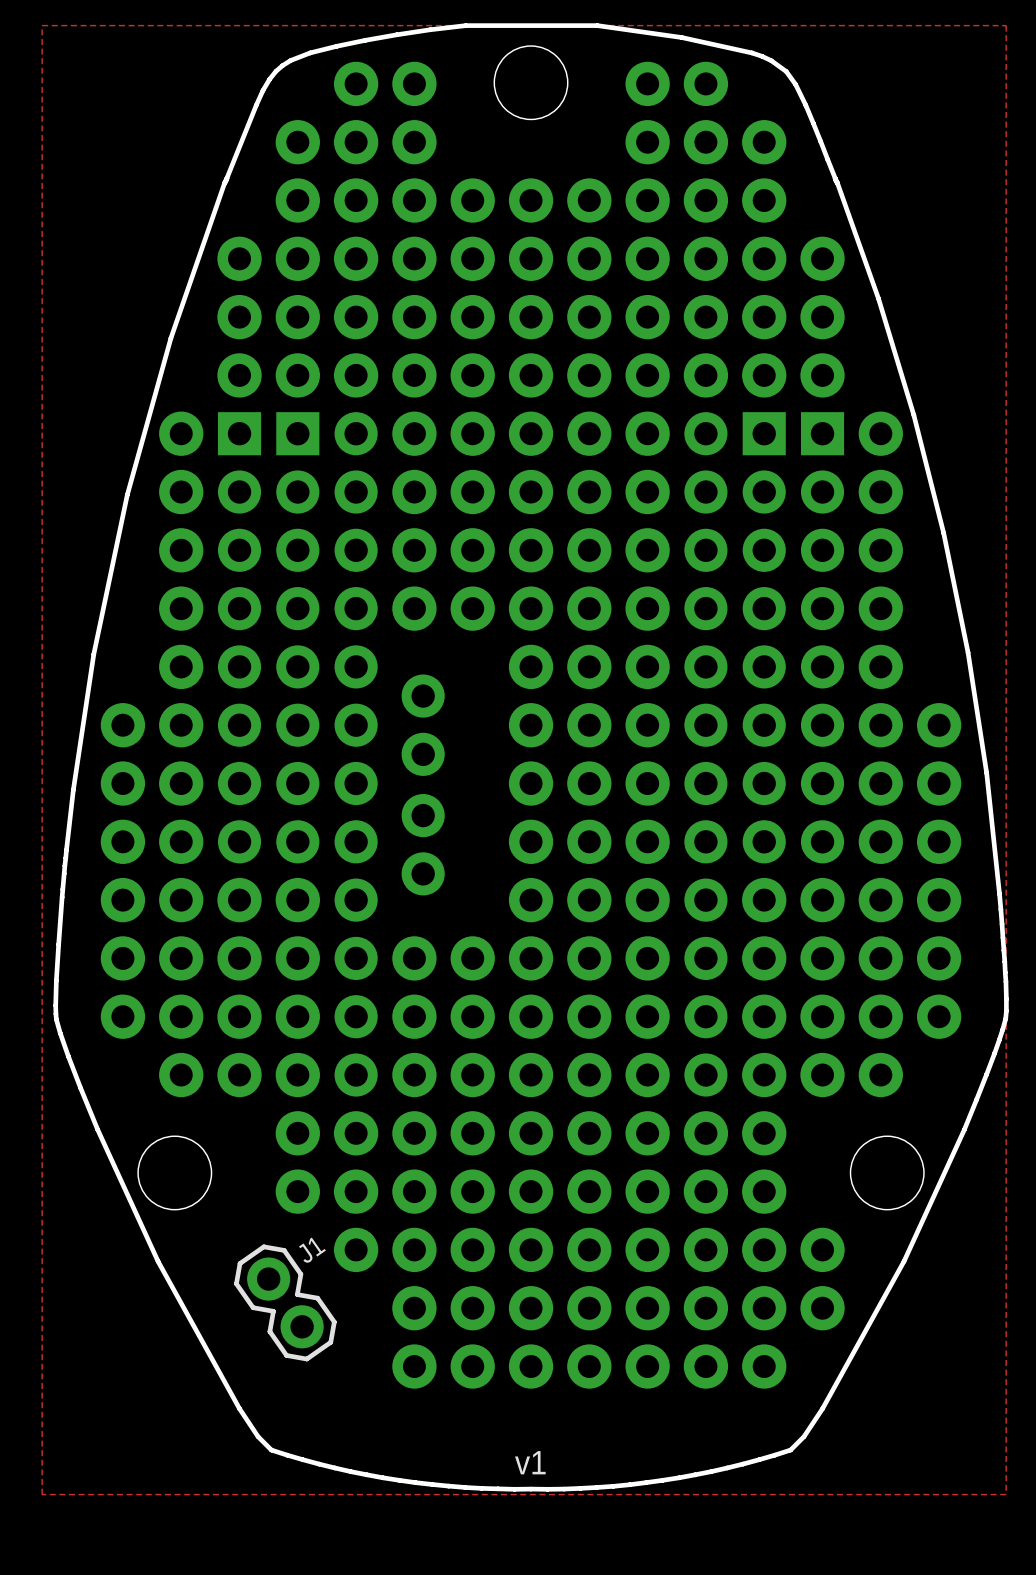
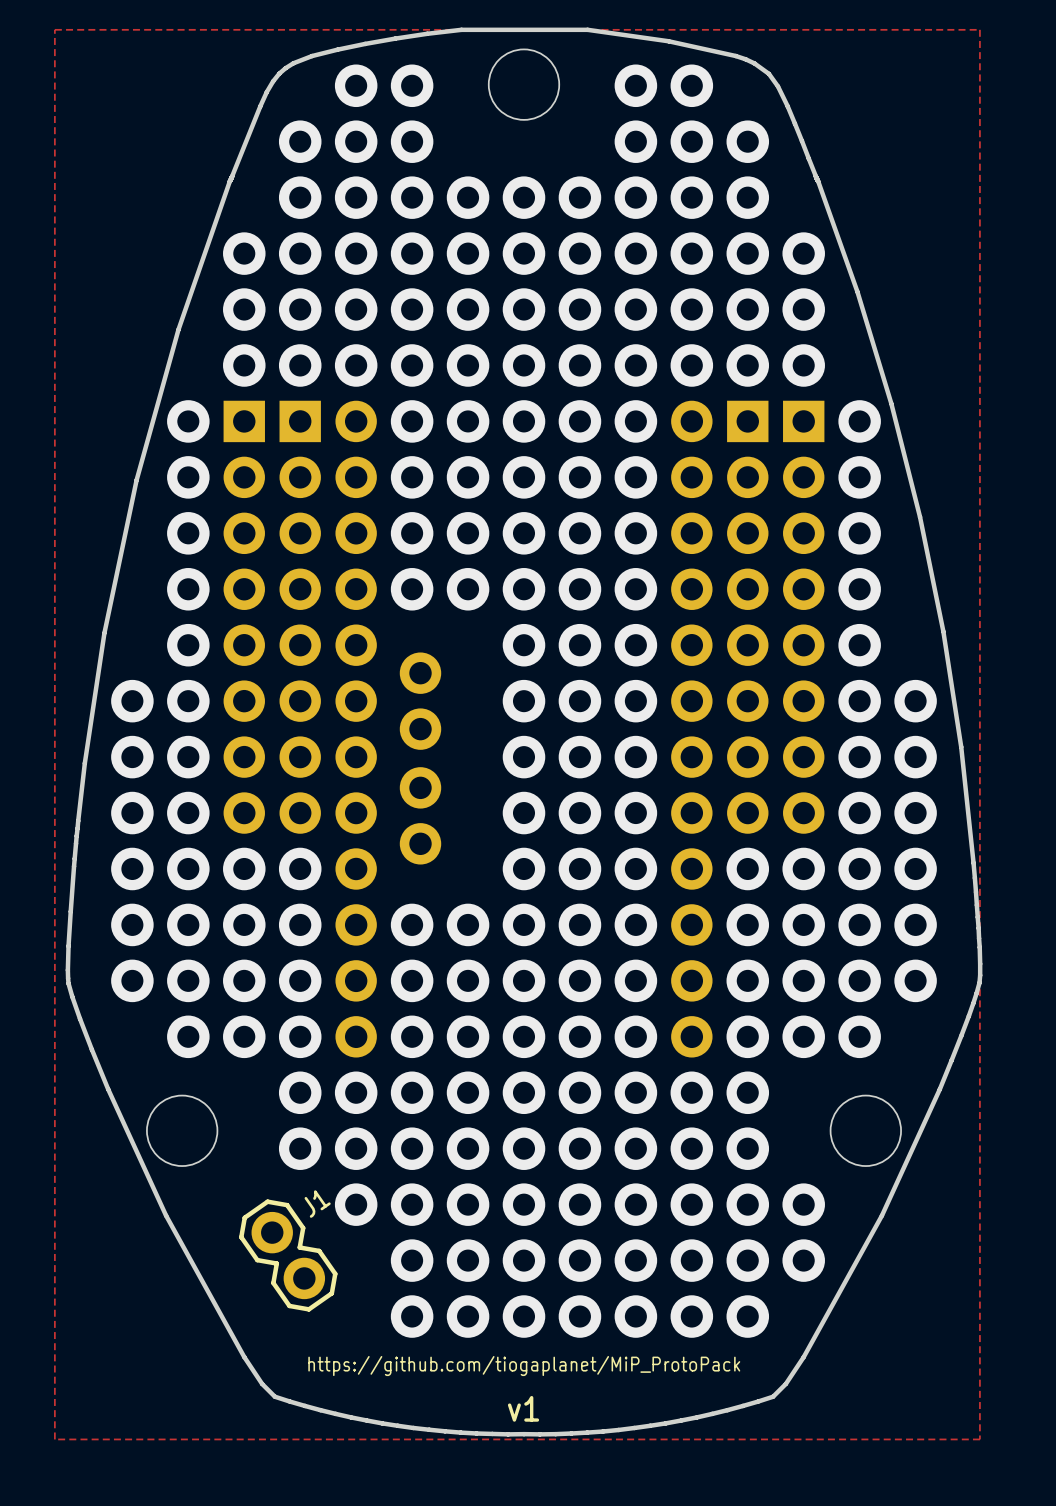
text: none -> https://github.com/tiogaplanet/MiP_ProtoPack (524, 1366)

